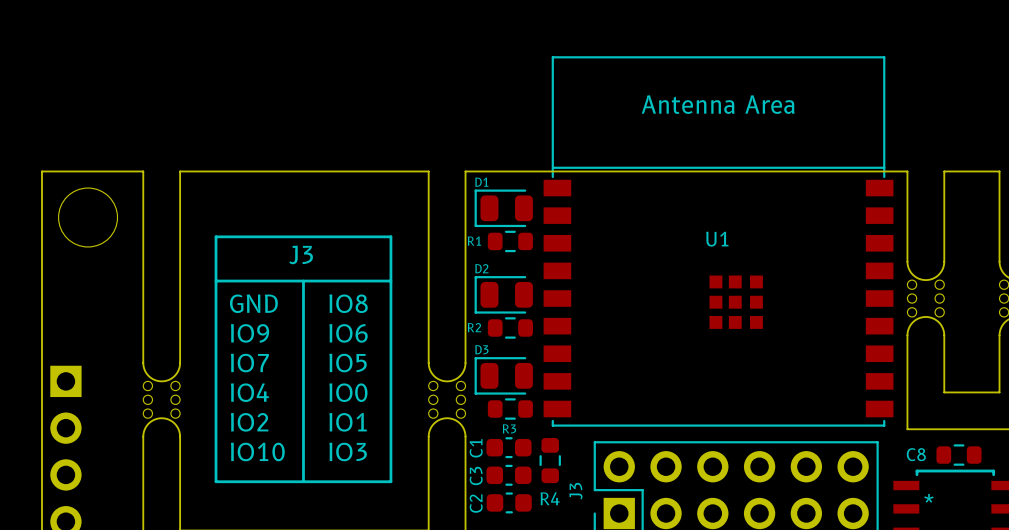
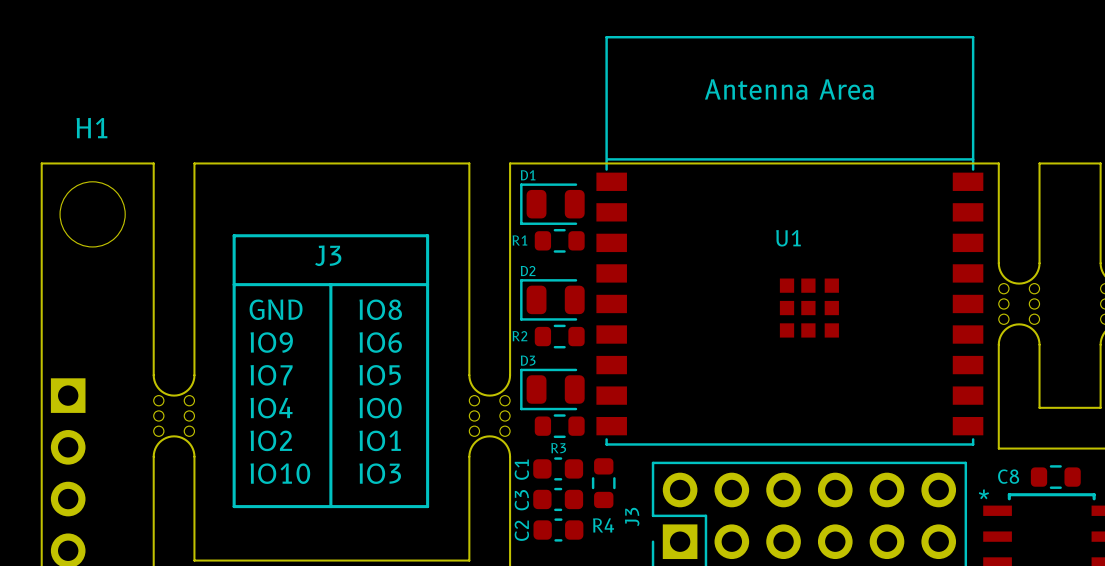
H1 name: none -> H1 (91, 128)
part text position: * (929, 498) -> * (983, 494)

